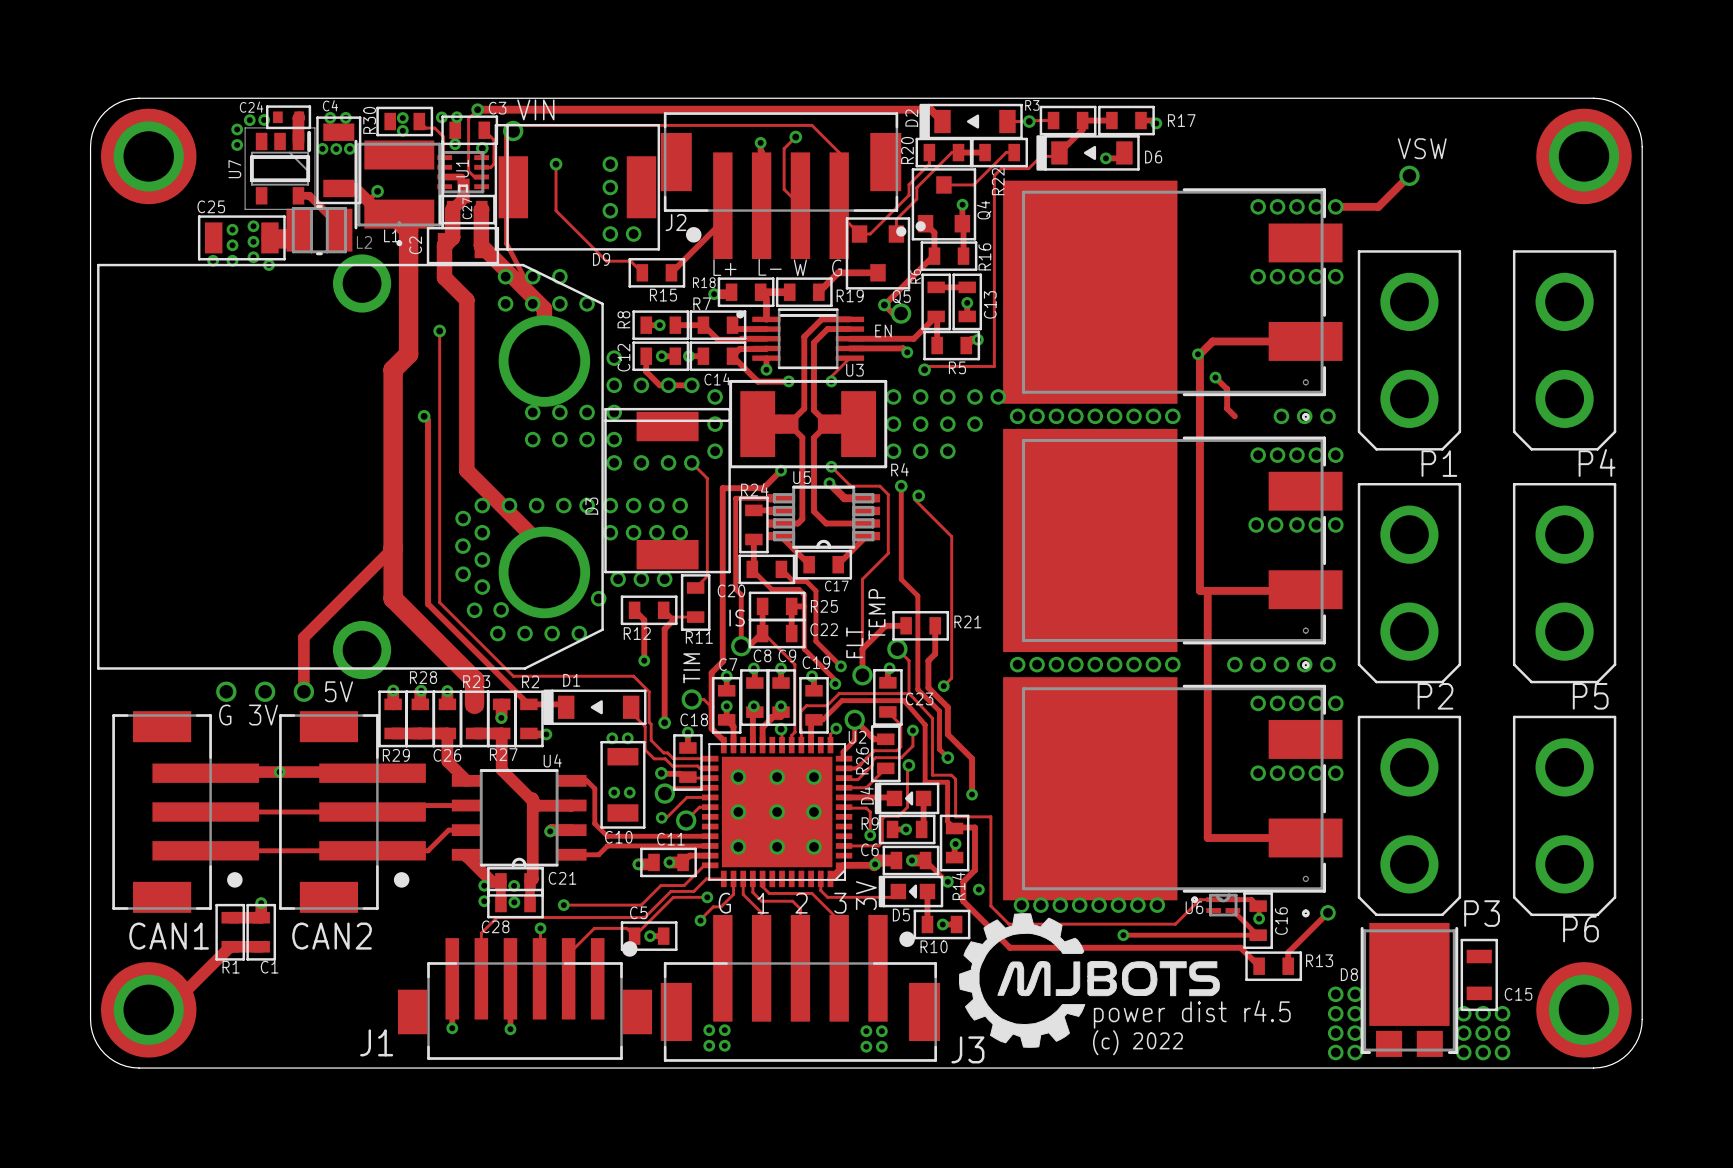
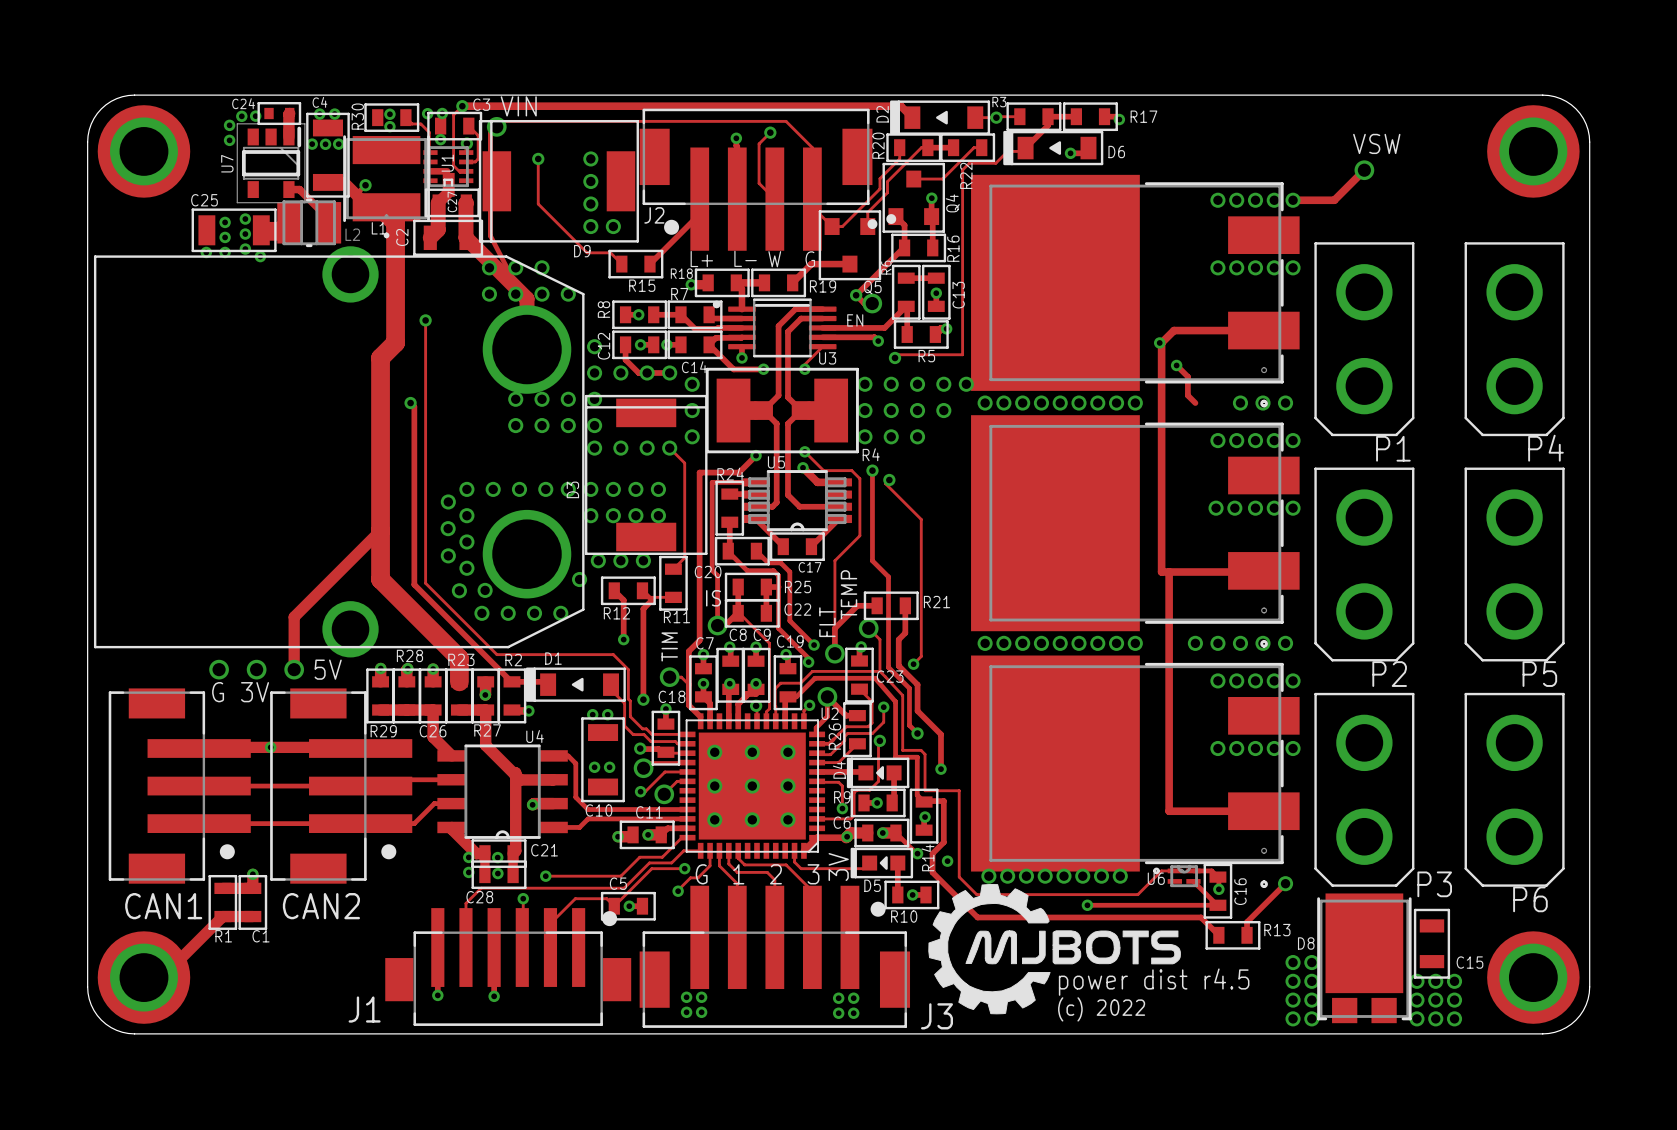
track: (444, 245) (444, 277) (466, 299) (466, 470) (559, 563) (551, 572) (544, 572) -> none

